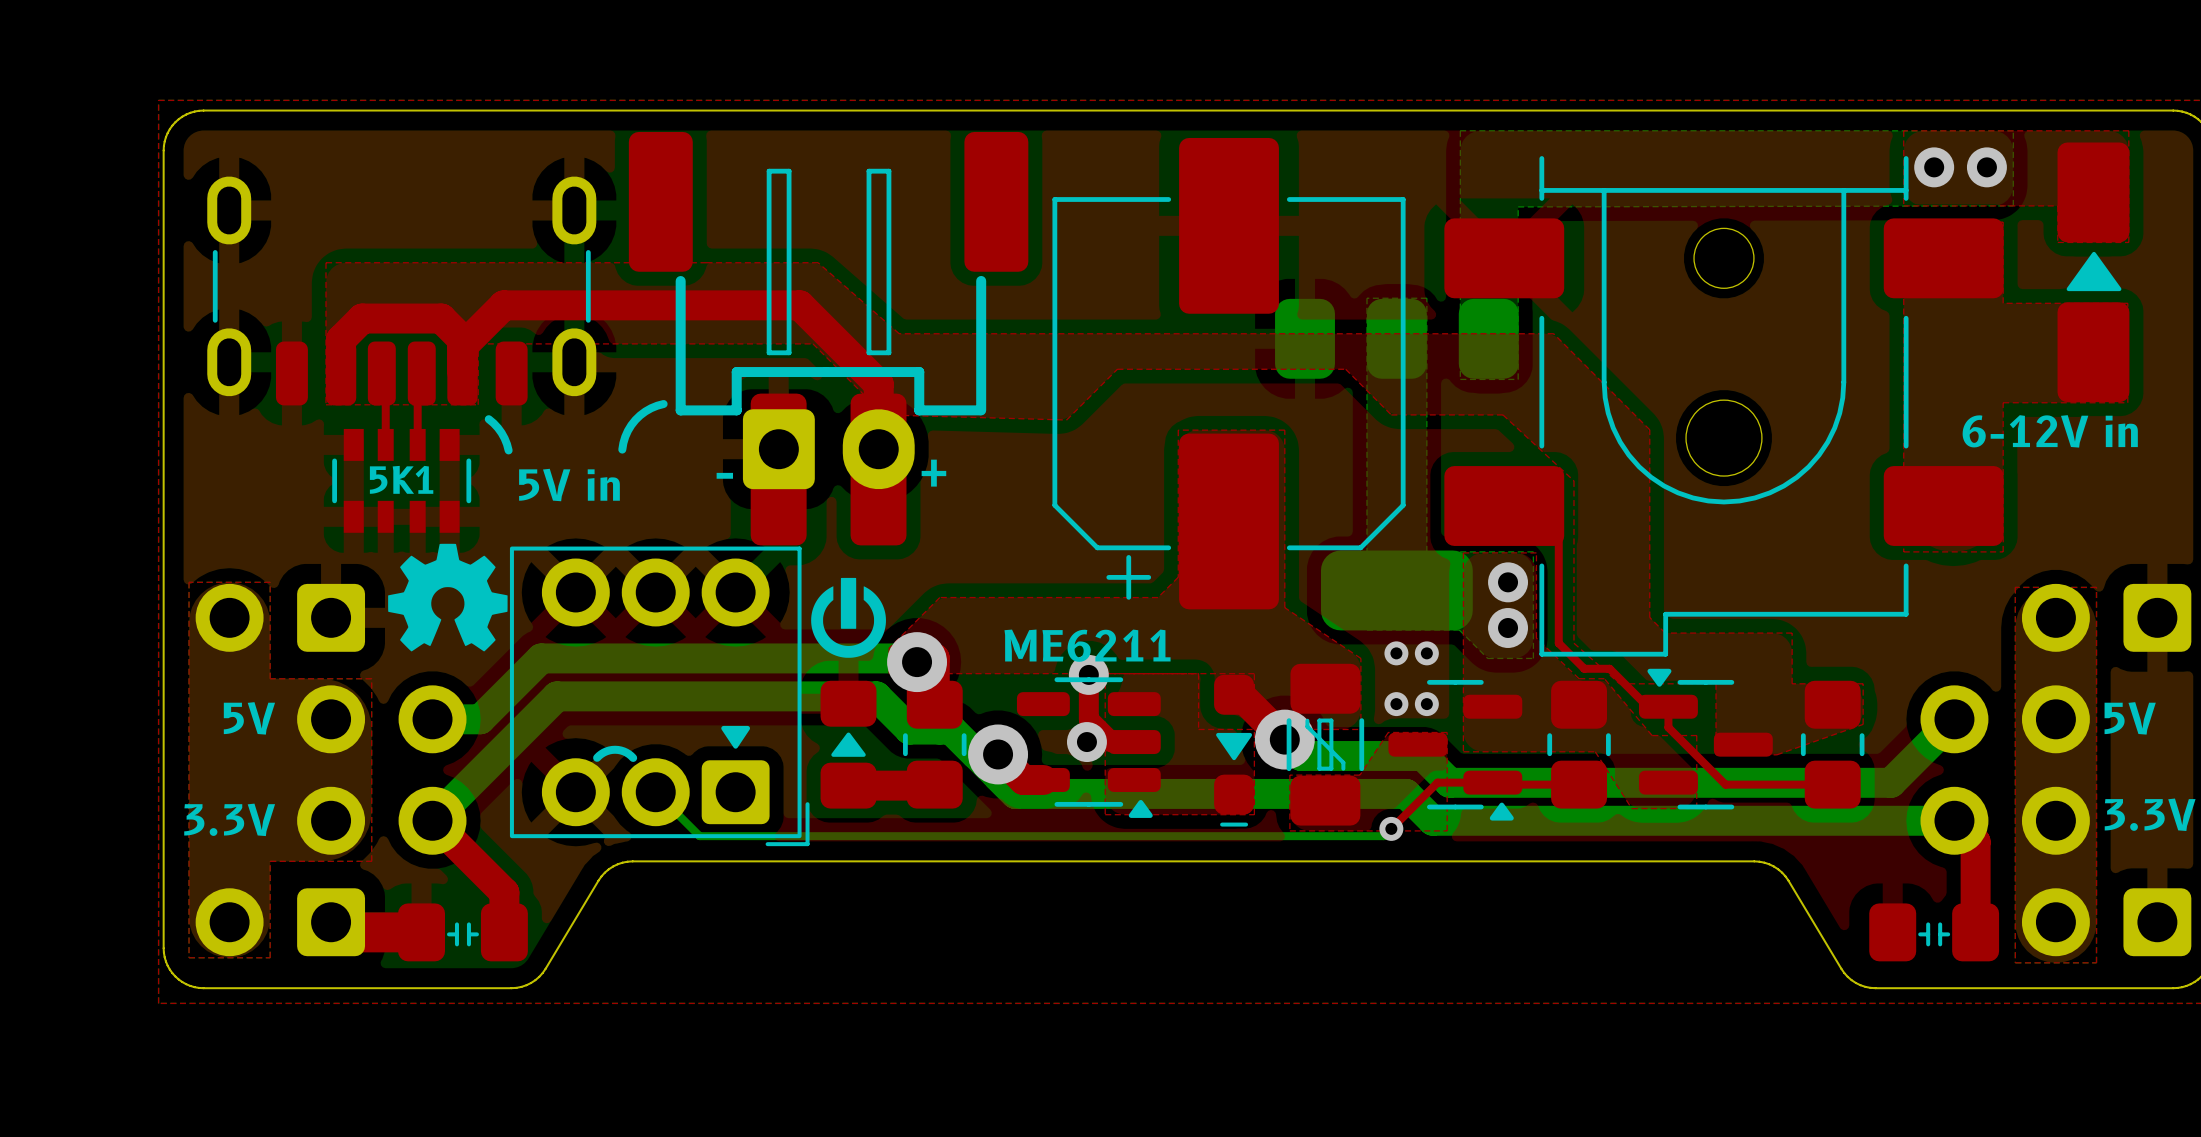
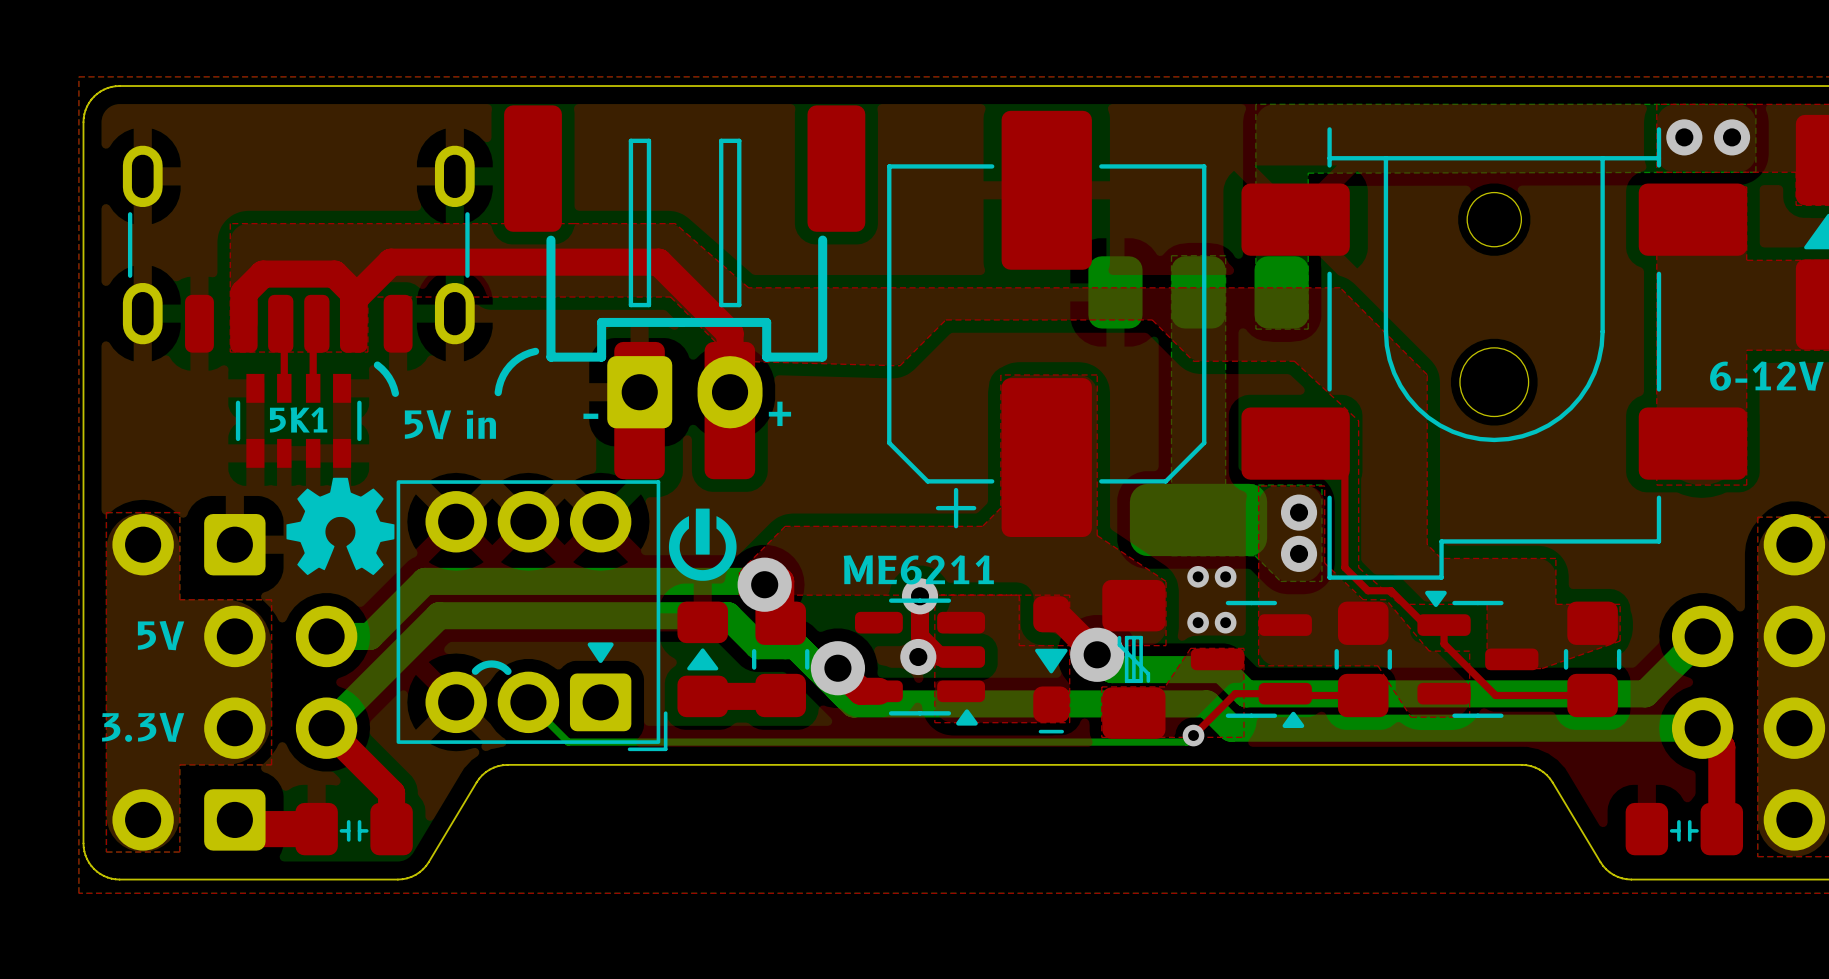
part footprint: [1286, 663, 1365, 826] -> [1102, 579, 1166, 739]

